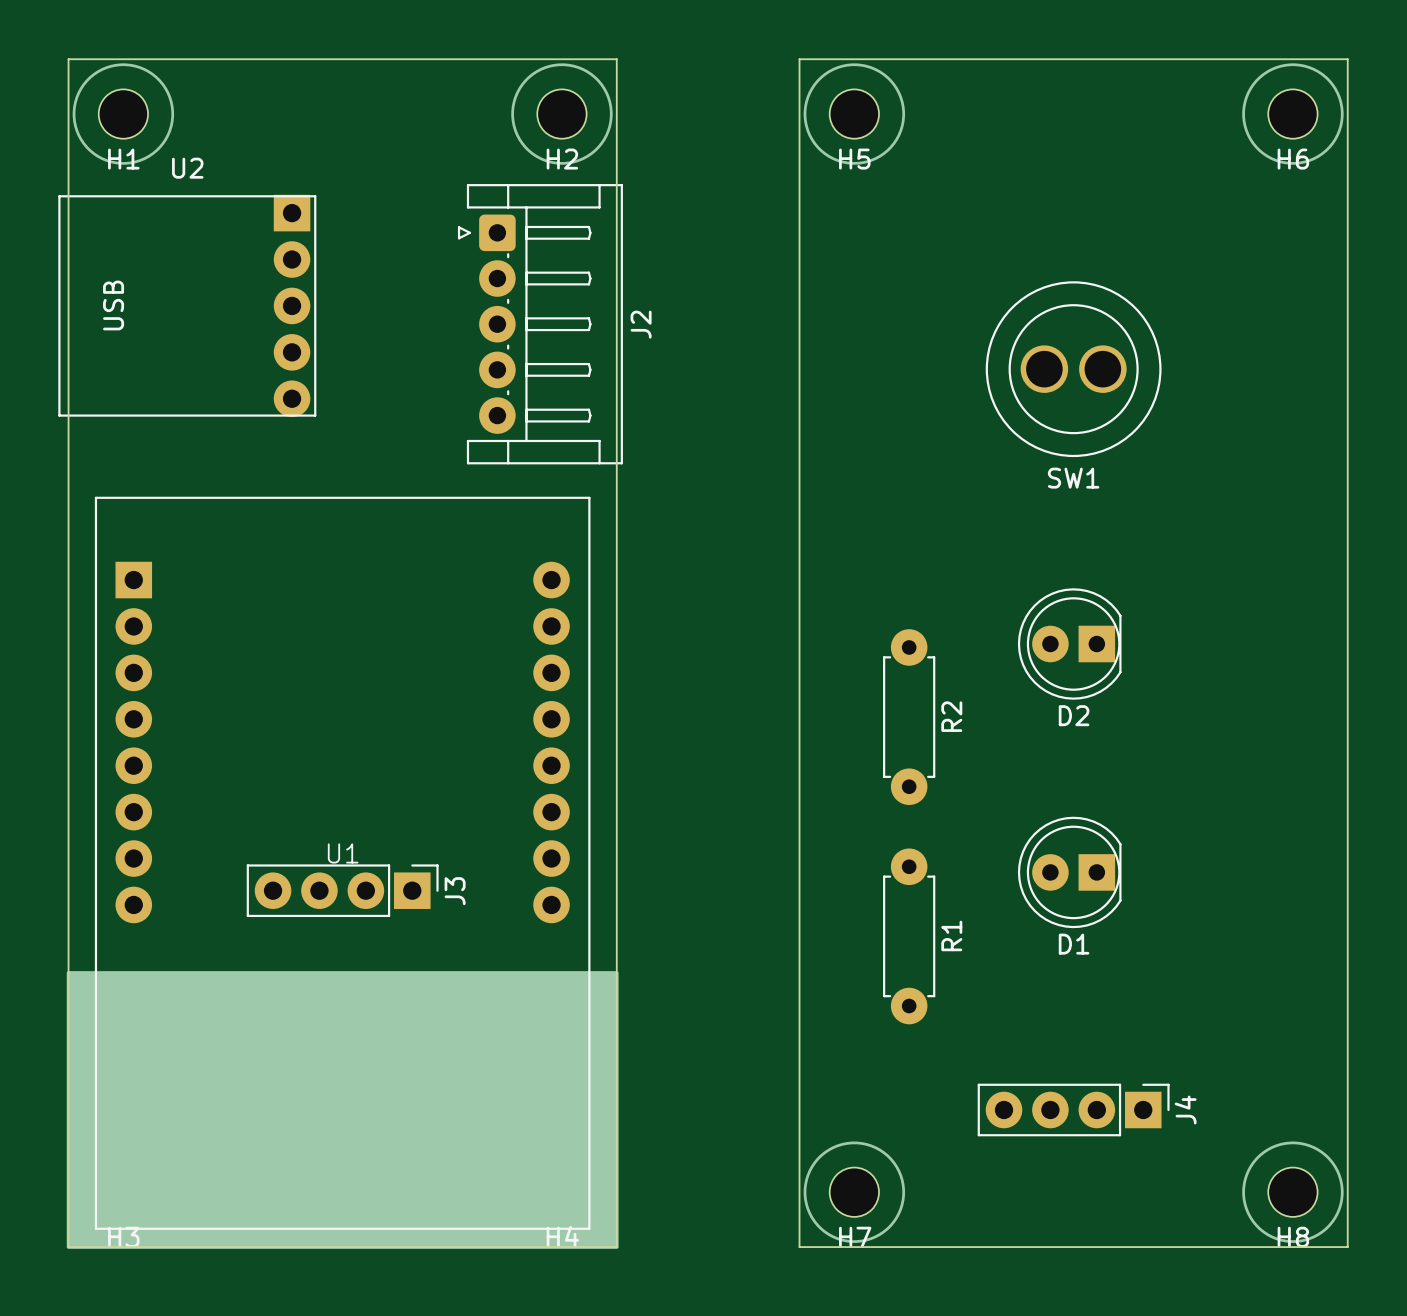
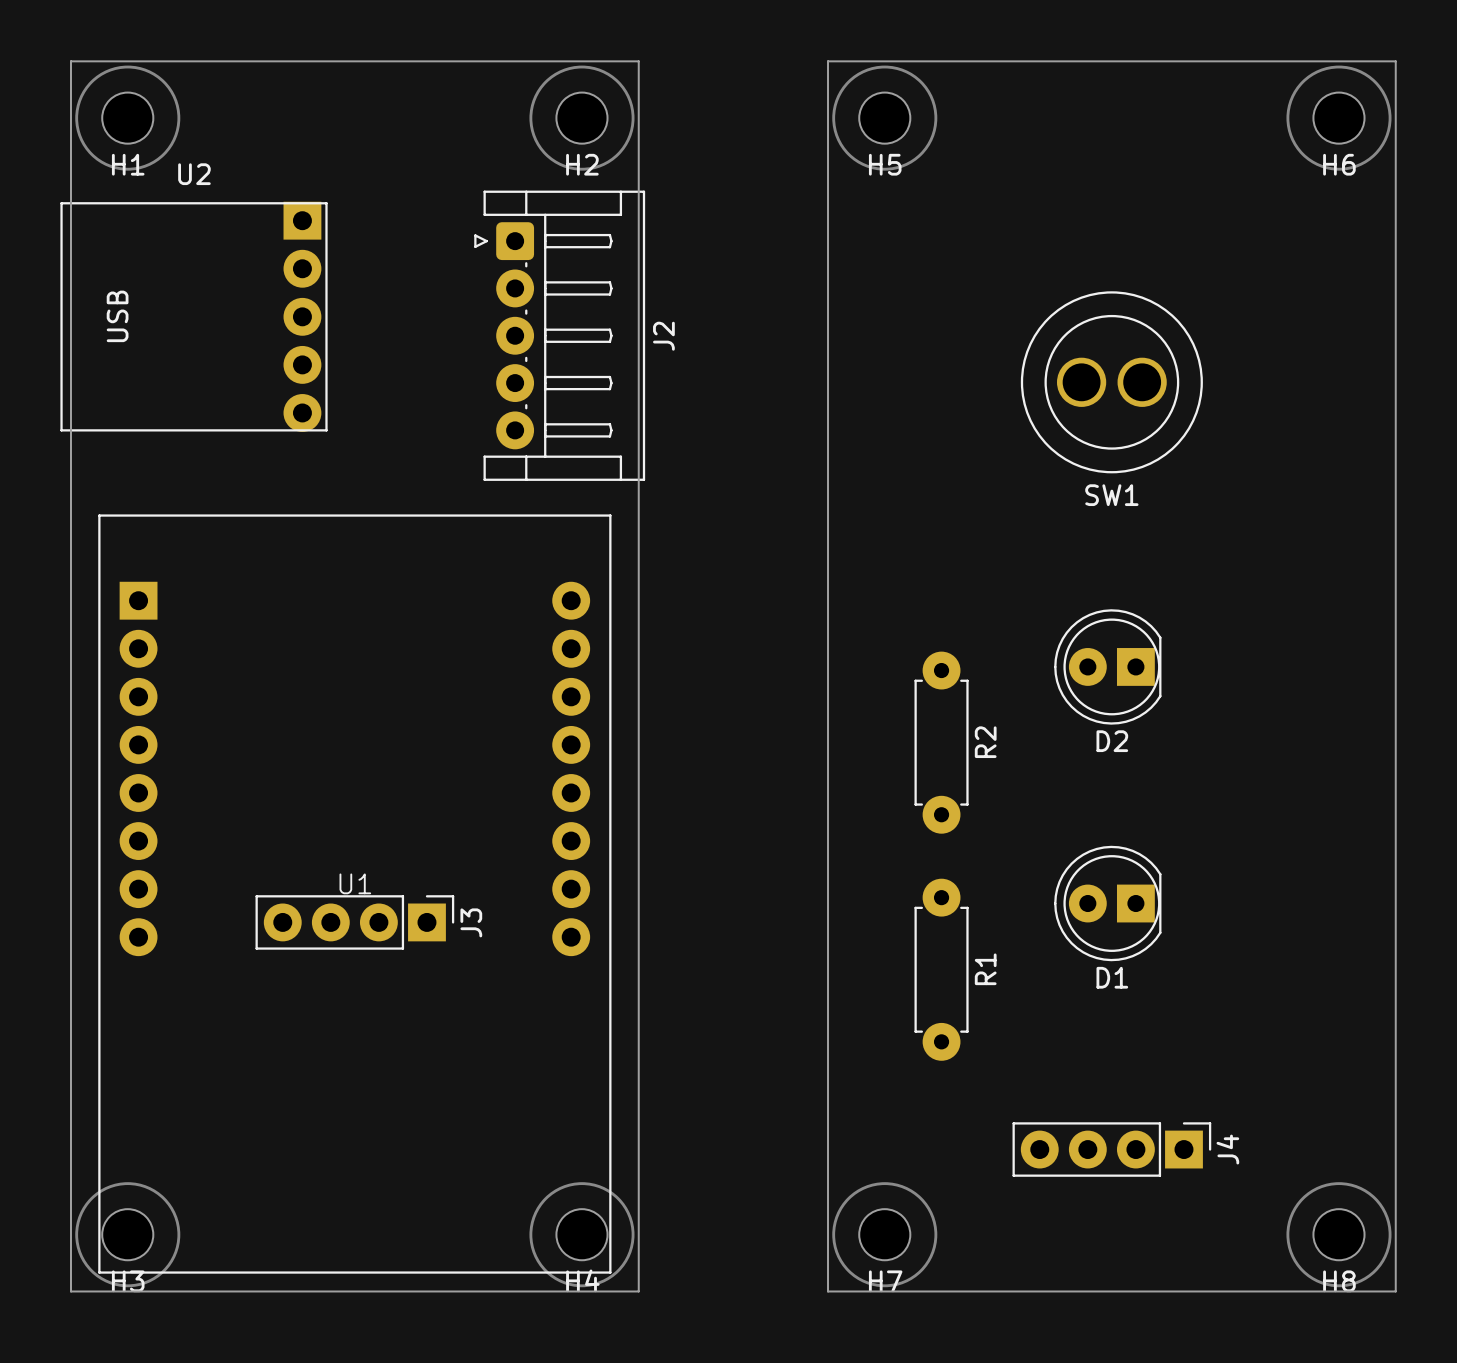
drawing: [66, 971, 619, 1249] -> none

